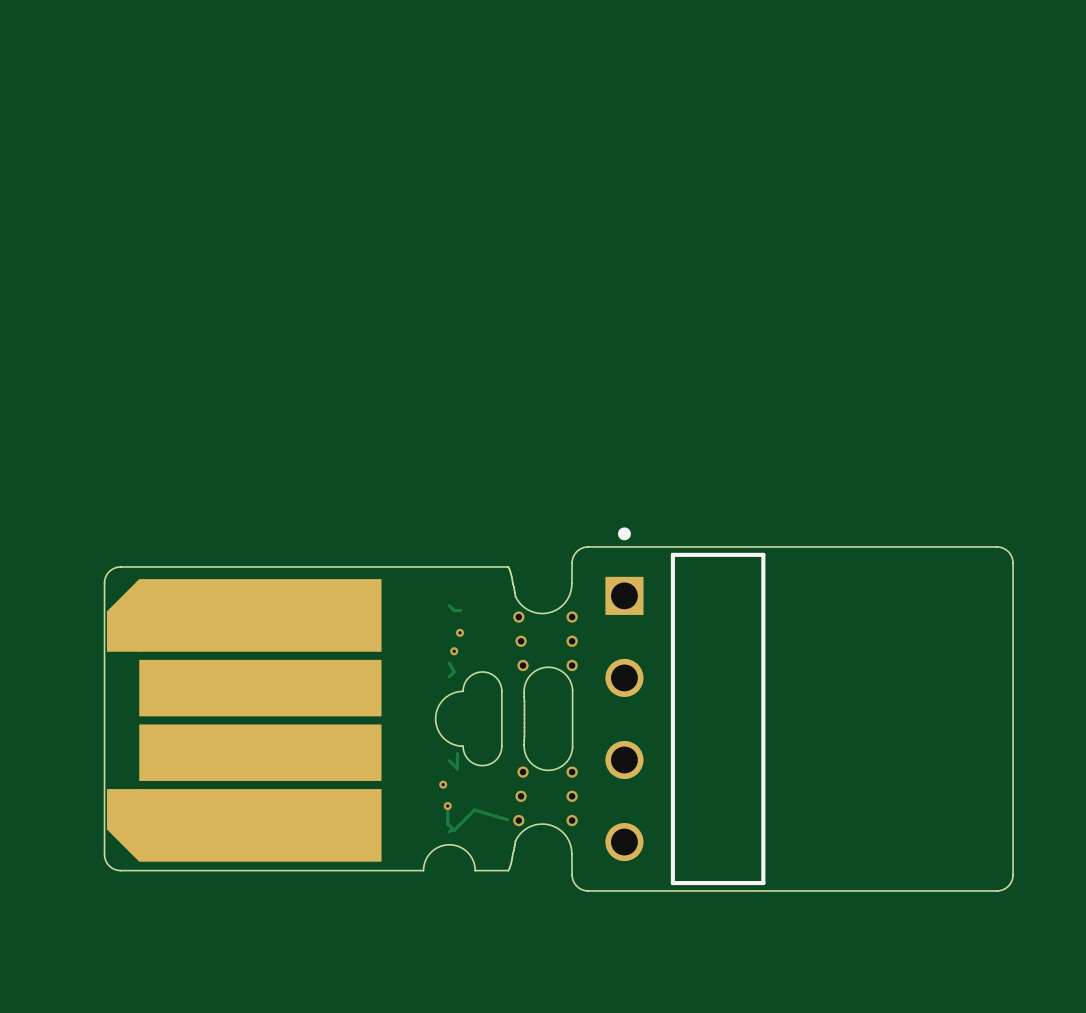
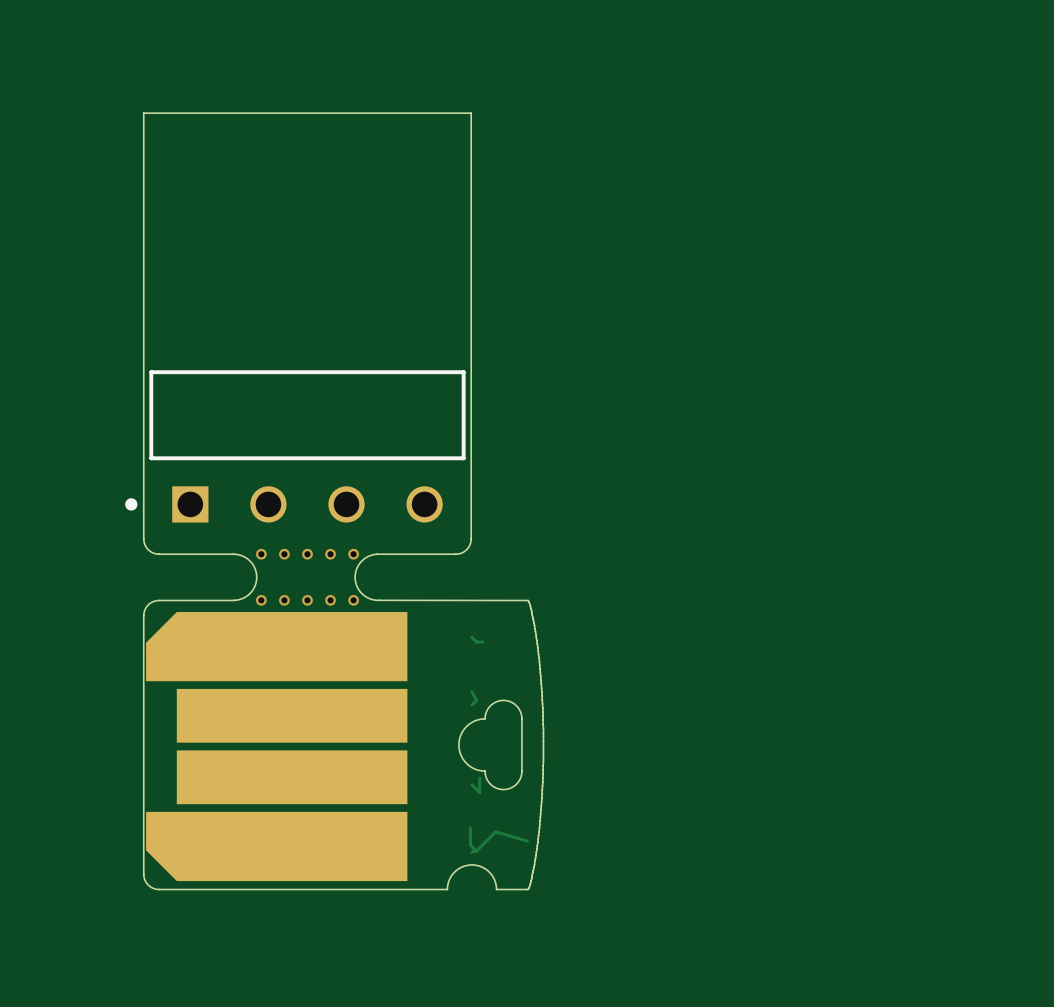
via: none -> (261, 554)
via: none -> (284, 554)
via: none -> (307, 554)
via: none -> (330, 554)
via: none -> (353, 554)
board edge: (199, 566) (508, 566) -> (233, 600) (247, 595) (255, 583) (254, 568) (245, 557) (233, 554) (157, 554) (148, 549) (143, 540) (143, 113) (471, 113) (470, 542) (465, 551) (457, 554) (371, 555) (363, 559) (357, 566) (355, 581) (362, 594) (376, 600) (528, 600)
via: none -> (261, 600)
via: none -> (284, 600)
via: none -> (307, 600)
via: none -> (330, 600)
via: none -> (353, 600)
board edge: (515, 596) (524, 607) (534, 612) (545, 613) (558, 608) (566, 600) (571, 590) (573, 556) (578, 550) (586, 547) (996, 546) (1004, 549) (1010, 554) (1013, 563) (1012, 876) (1008, 886) (996, 890) (586, 890) (578, 887) (573, 881) (571, 846) (566, 836) (558, 829) (545, 824) (534, 825) (524, 829) (515, 841) -> (543, 769) (539, 832) (534, 861)
via: (518, 617) -> none
via: (572, 617) -> none
via: (460, 632) -> none
via: (521, 641) -> none
via: (572, 641) -> none
via: (454, 651) -> none
via: (523, 665) -> none
via: (572, 665) -> none
board edge: (524, 692) (526, 680) (538, 669) (553, 667) (566, 675) (572, 690) (572, 747) (570, 756) (564, 764) (556, 768) (547, 770) (538, 768) (530, 762) (525, 754) (524, 744) -> (543, 720) (539, 657) (534, 628)
part rotation: 0° (685, 706) -> 90° counterclockwise (295, 446)
part position: (685, 706) -> (295, 446)
via: (523, 772) -> none
via: (572, 772) -> none
via: (443, 784) -> none
via: (521, 796) -> none
via: (572, 796) -> none
via: (447, 806) -> none
via: (518, 820) -> none
via: (572, 820) -> none

